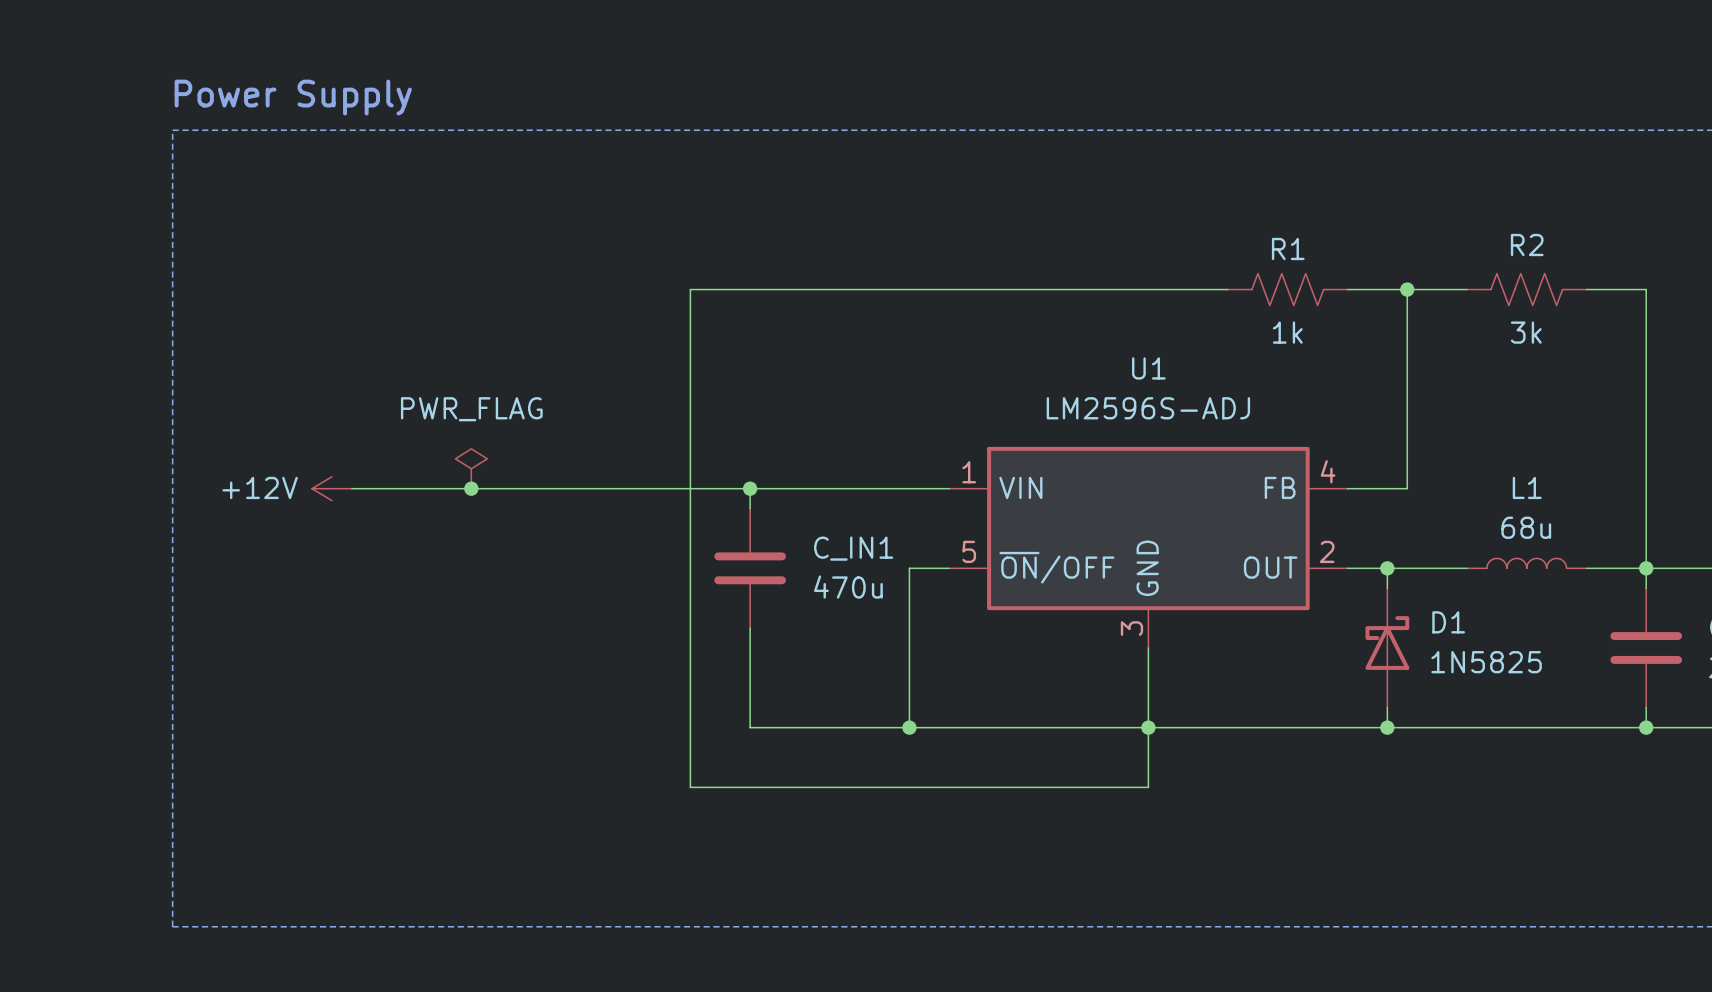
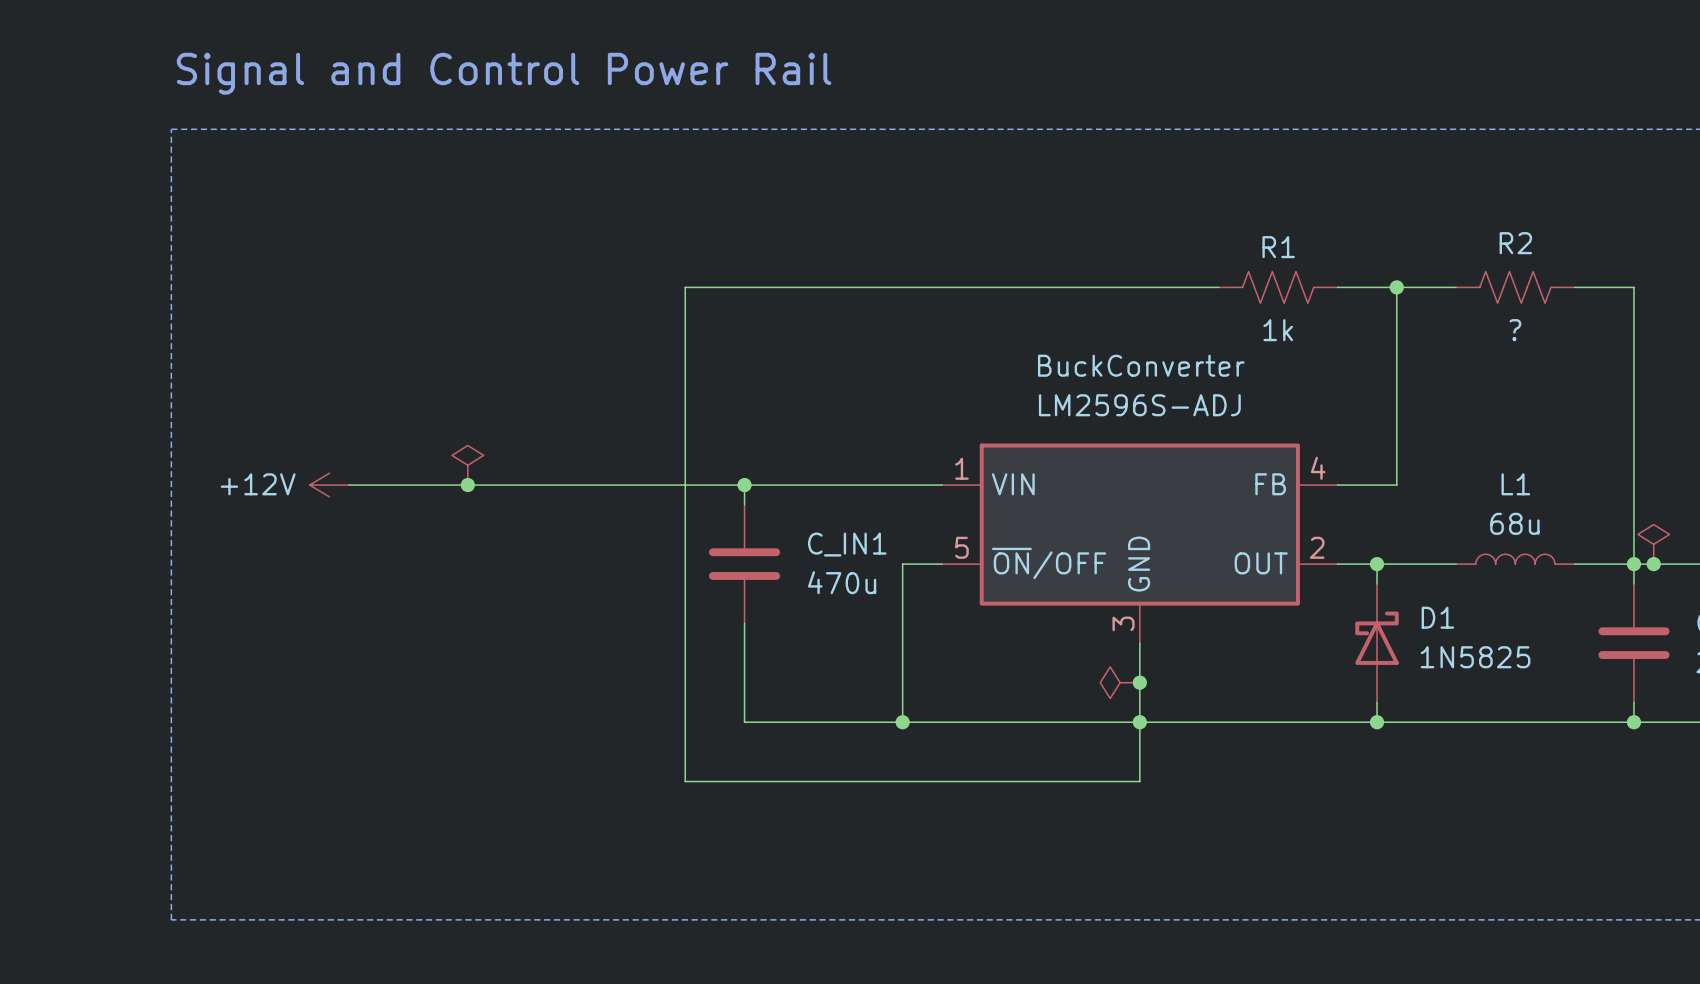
text: none -> Signal and Control Power Rail (504, 73)
text: Power Supply (293, 97) -> none
R2 value: 3k (1526, 332) -> ? (1515, 330)
U1 name: U1 (1148, 368) -> BuckConverter (1141, 365)
power symbol text: PWR_FLAG (471, 409) -> none
power symbol: none -> (1653, 544)
junction: none -> (1653, 564)
power symbol: none -> (1120, 682)
junction: none -> (1139, 682)

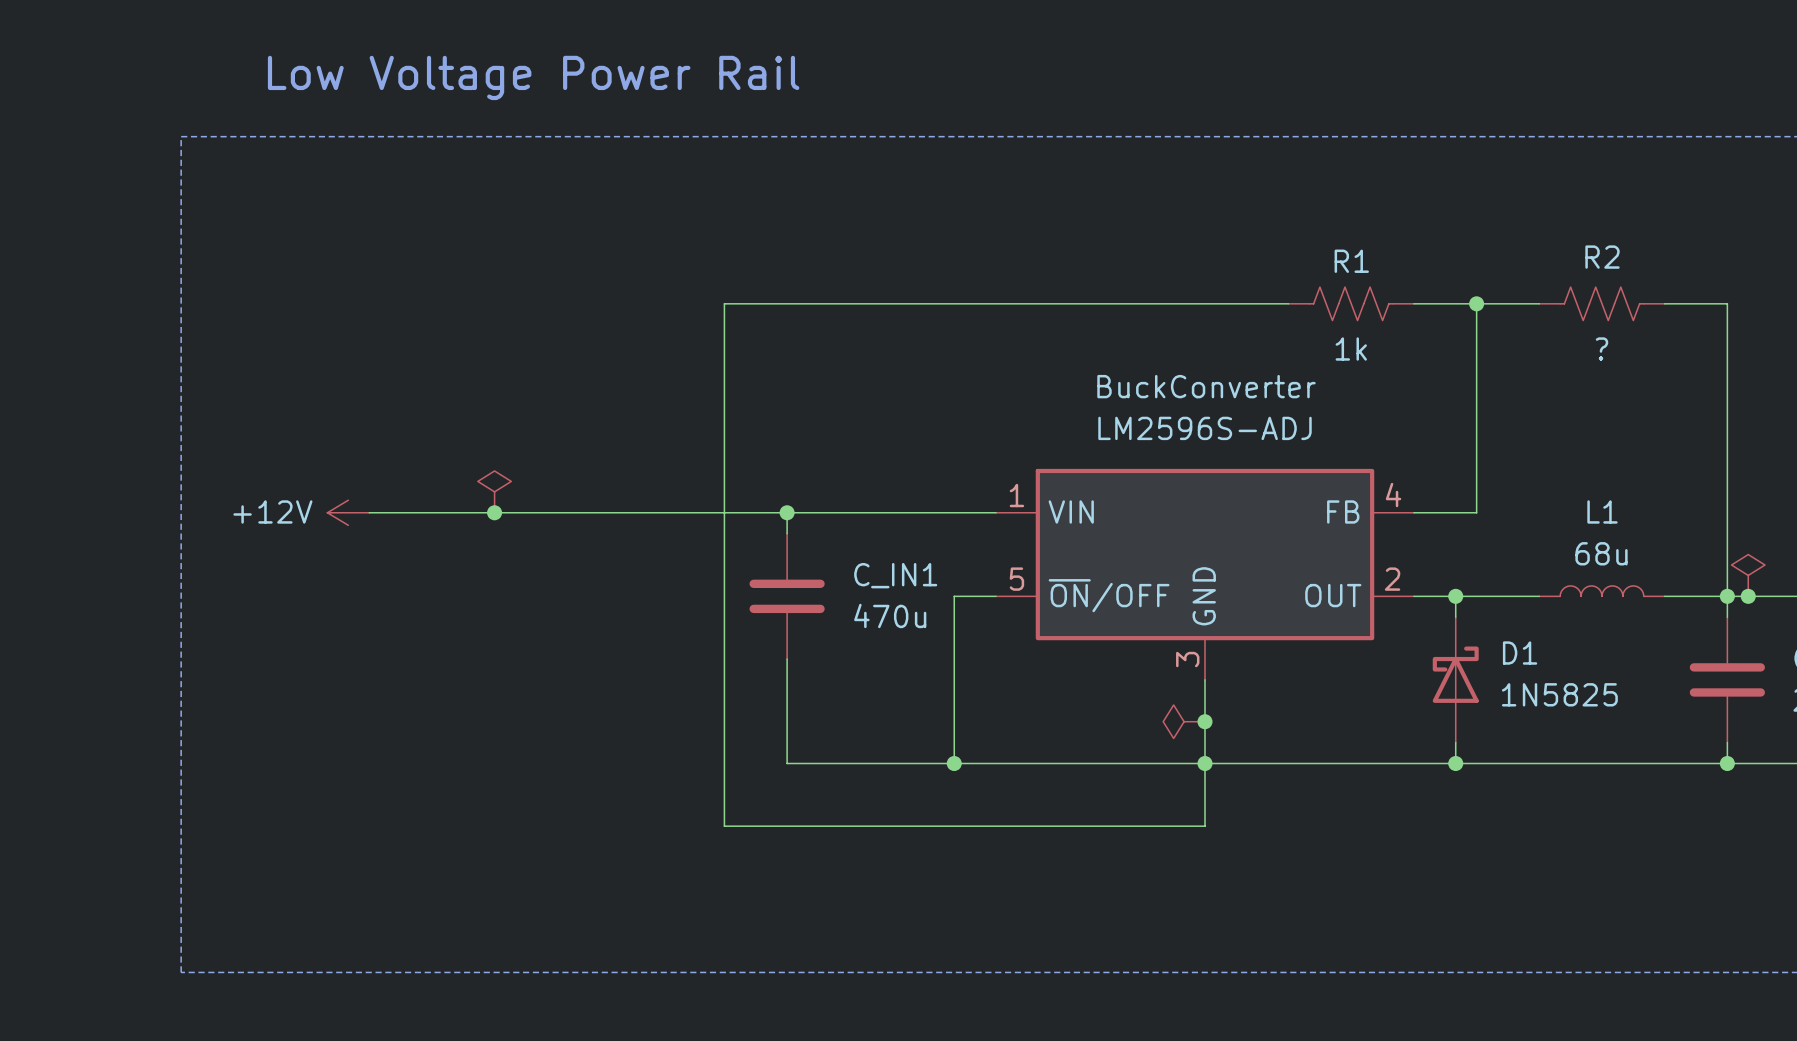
text: Signal and Control Power Rail (504, 73) -> Low Voltage Power Rail (533, 77)

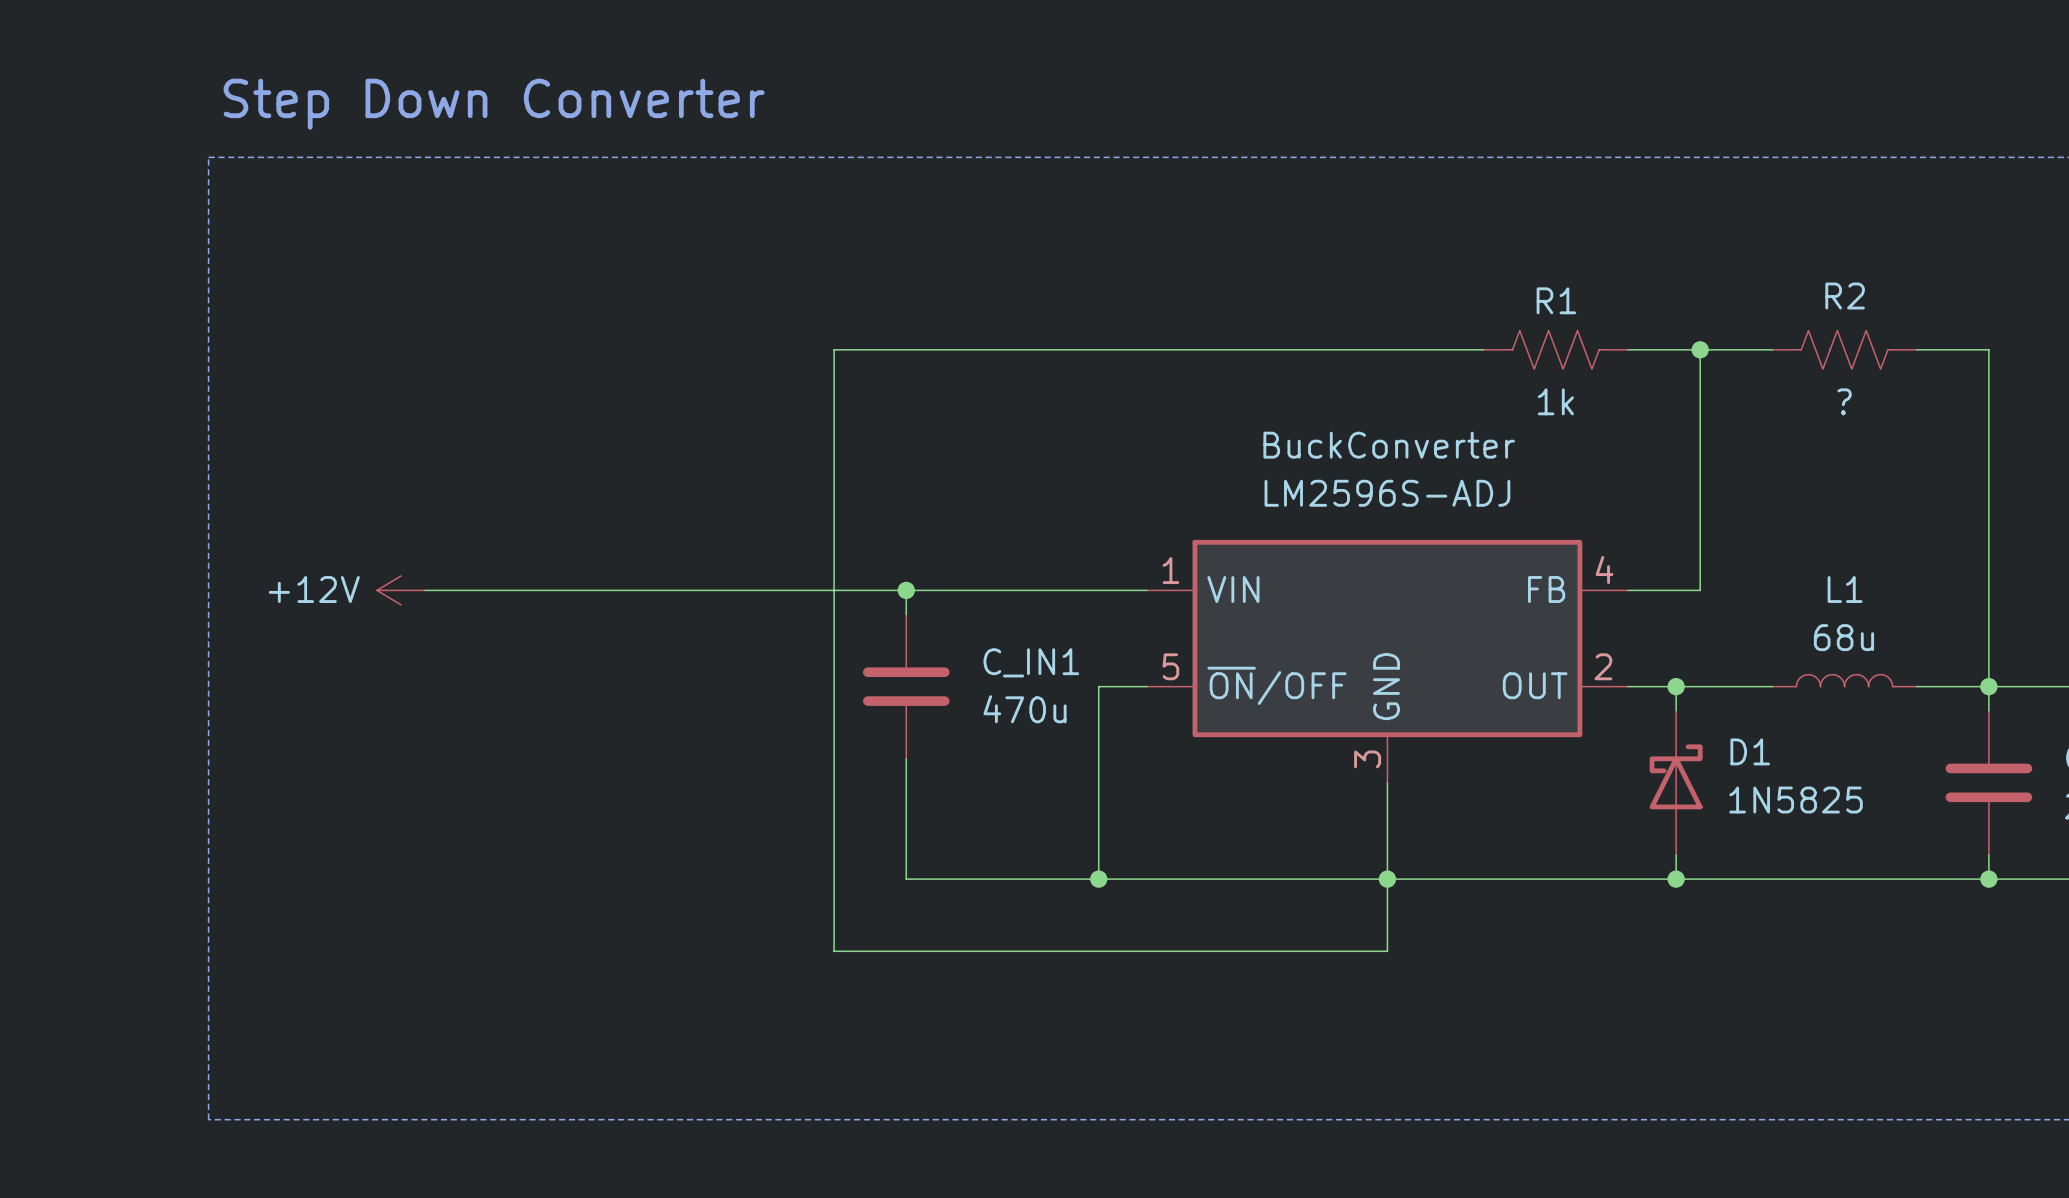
text: Low Voltage Power Rail (533, 77) -> none
text: none -> Step Down Converter (494, 104)
power symbol: (494, 491) -> none
junction: (494, 512) -> none
power symbol: (1748, 575) -> none
junction: (1748, 596) -> none
power symbol: (1184, 721) -> none
junction: (1204, 721) -> none

